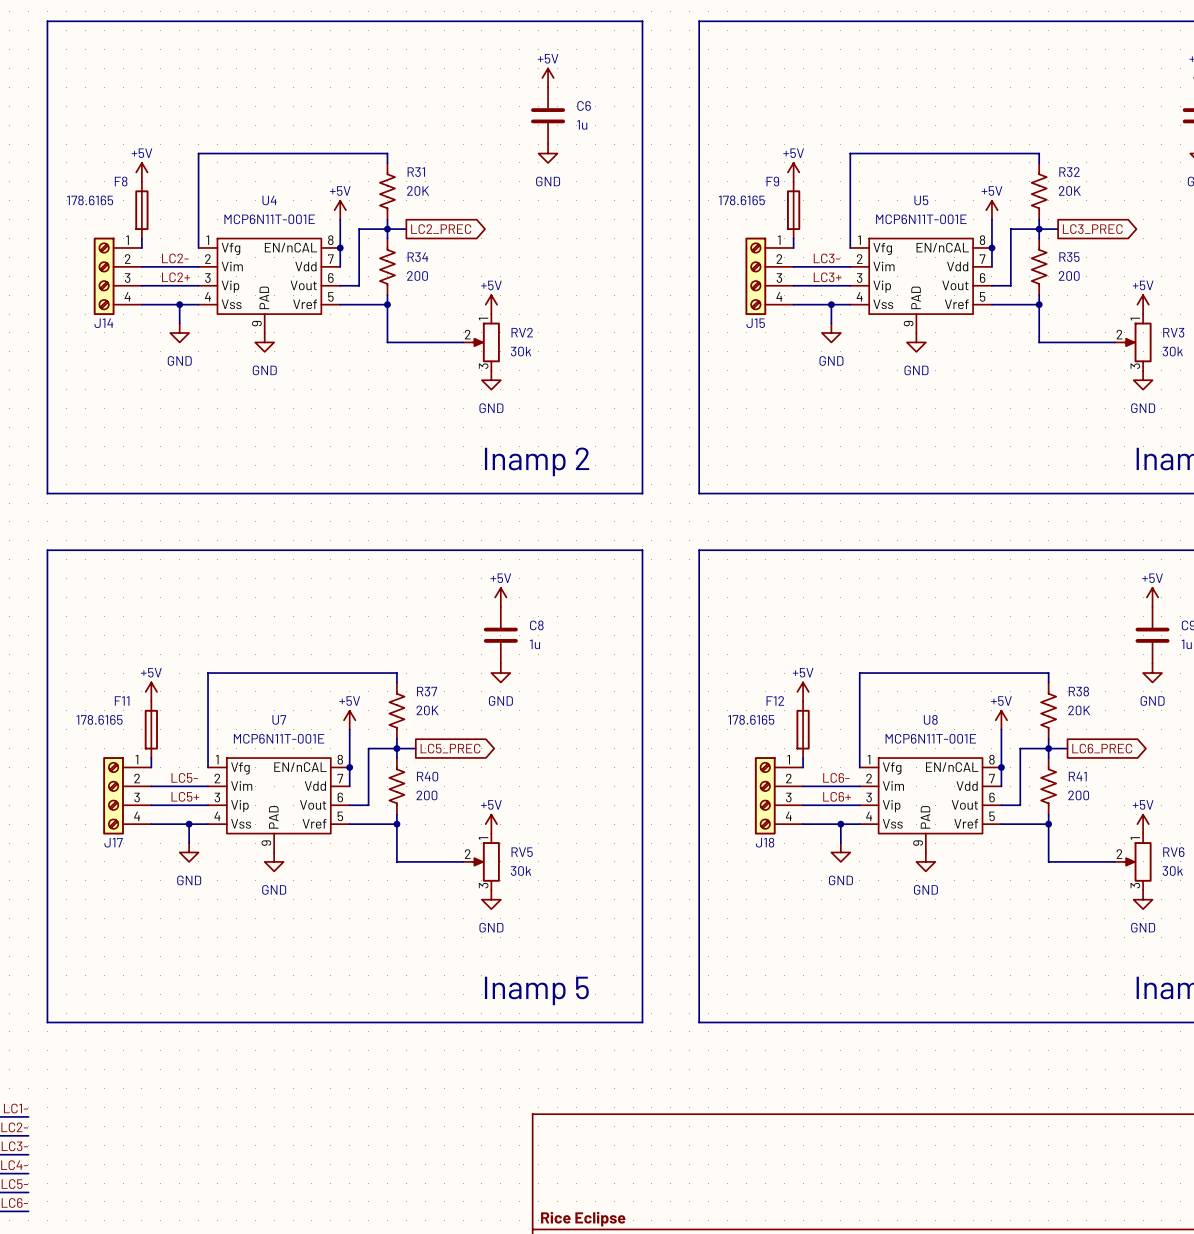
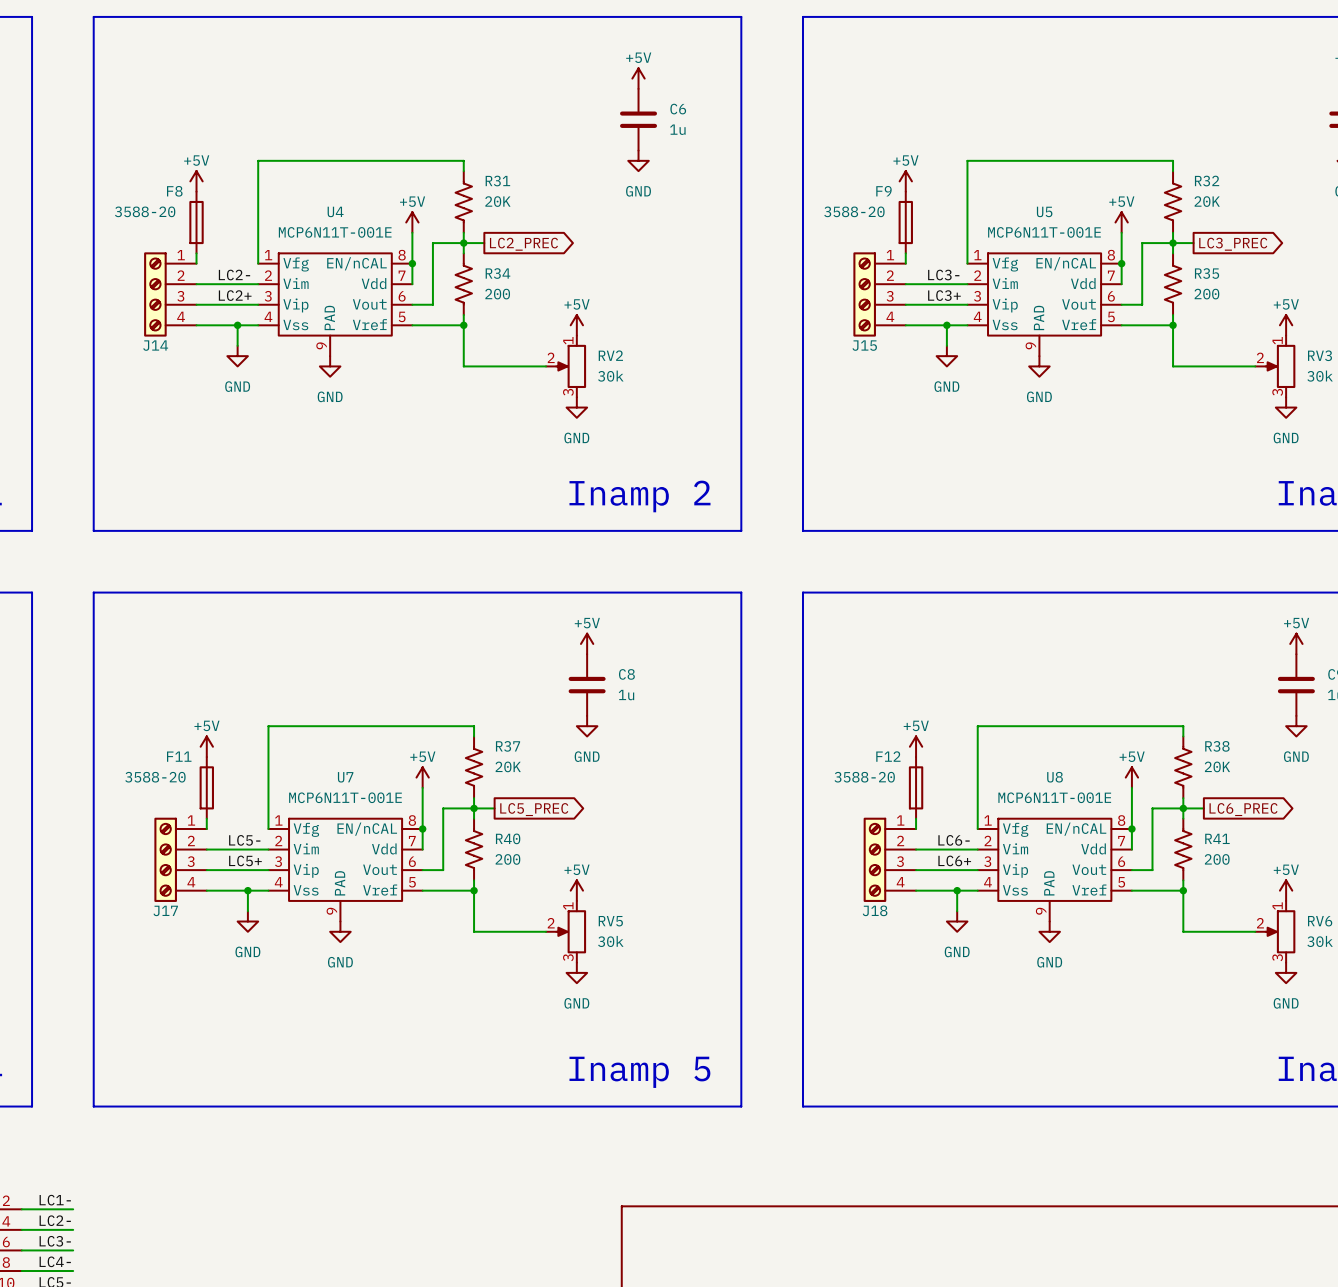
F8 value: 178.6165 (90, 200) -> 3588-20 (145, 211)
F9 value: 178.6165 (741, 200) -> 3588-20 (854, 211)
F11 value: 178.6165 (99, 719) -> 3588-20 (155, 777)
F12 value: 178.6165 (751, 719) -> 3588-20 (864, 777)

